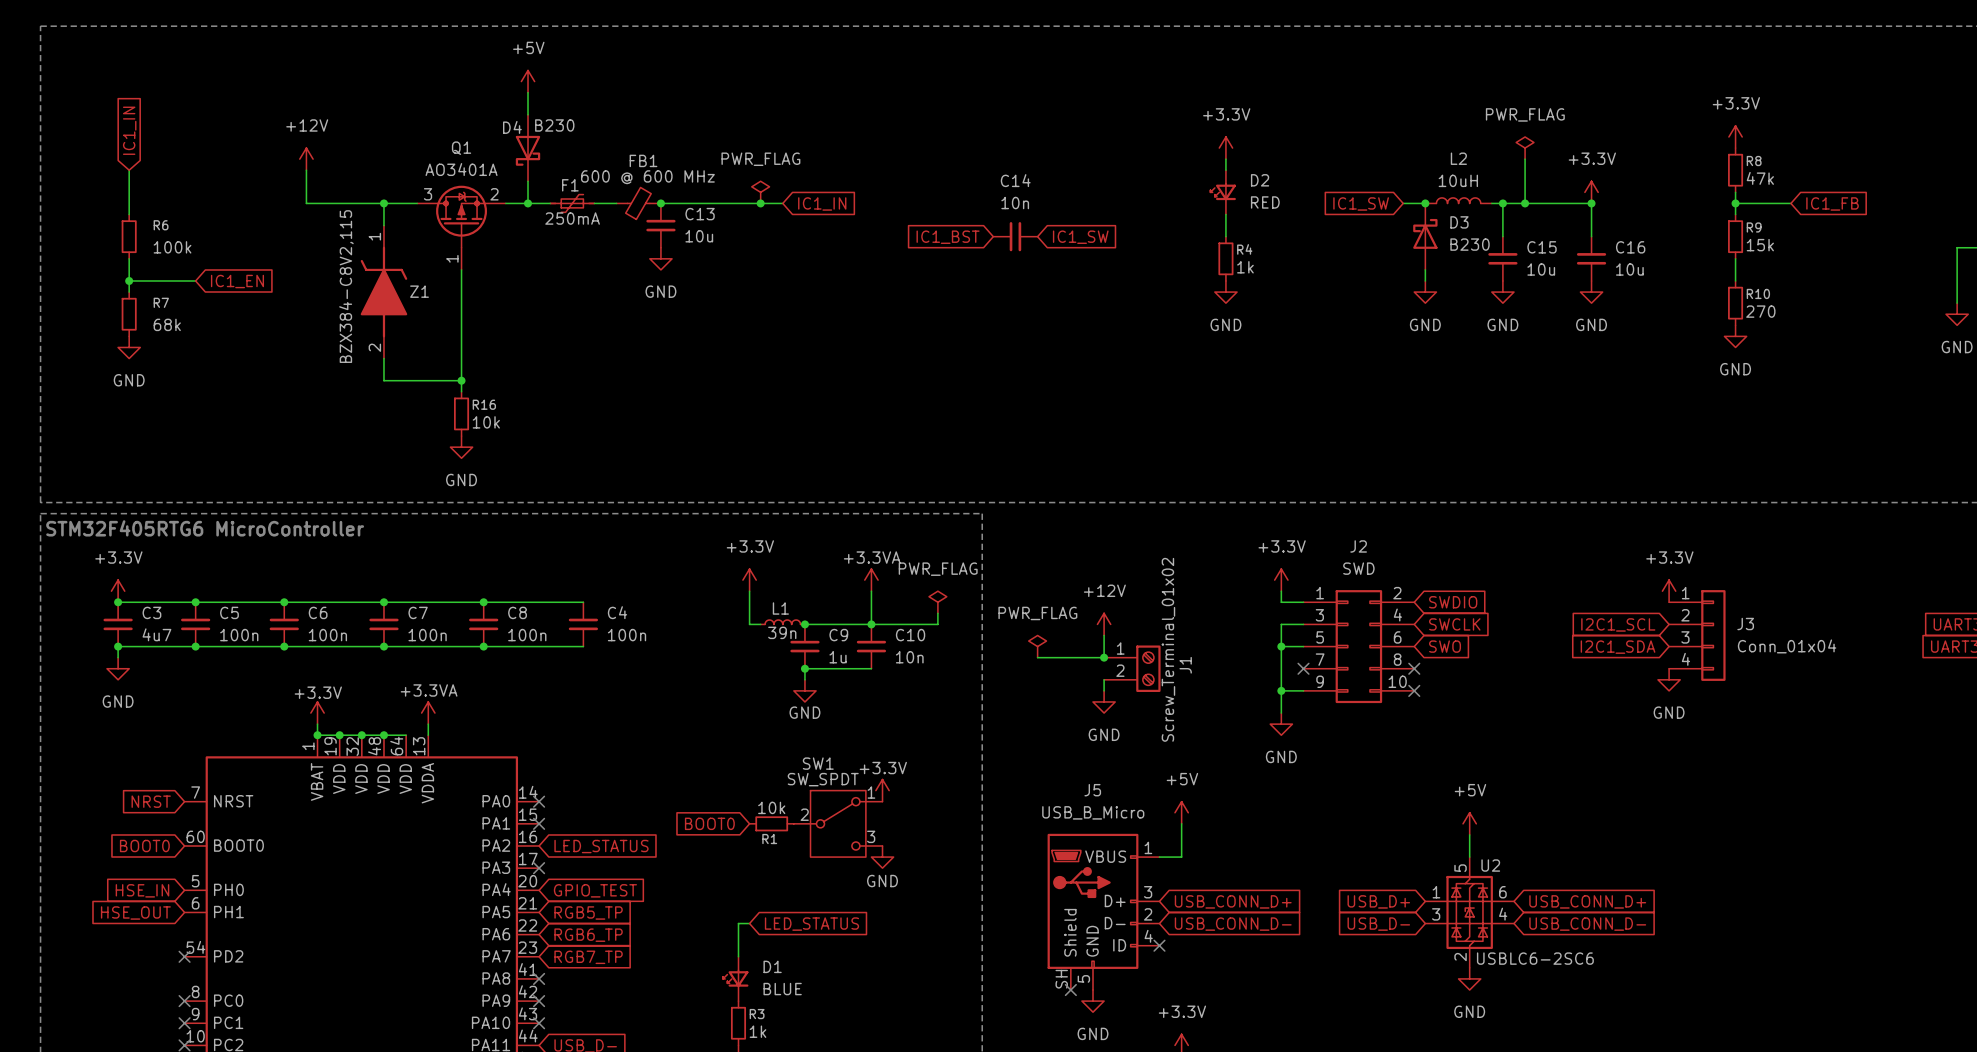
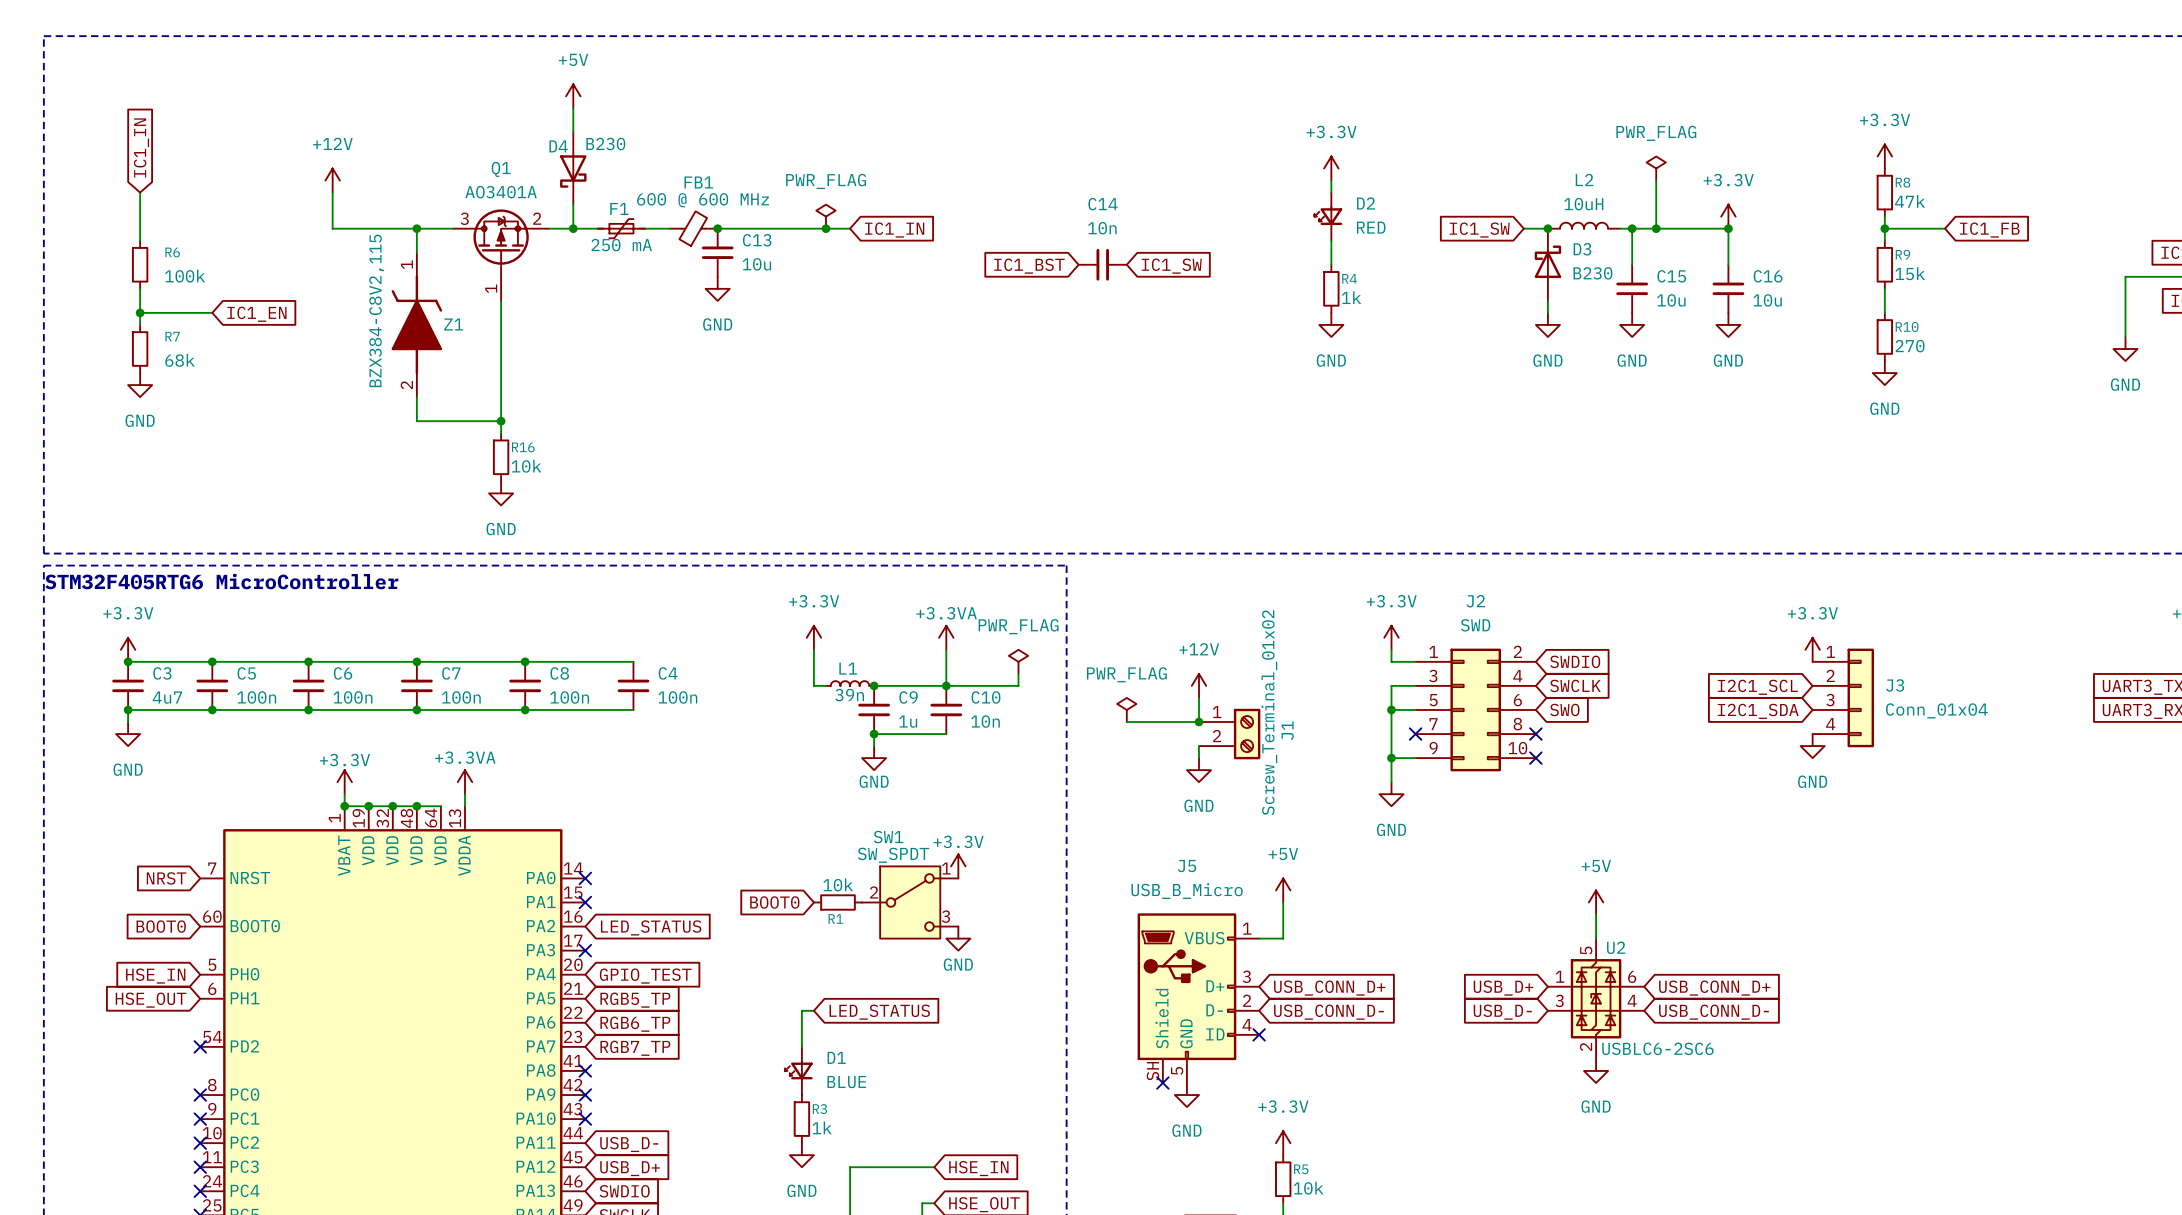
F1 value: 250mA (572, 218) -> 250 mA (621, 245)

